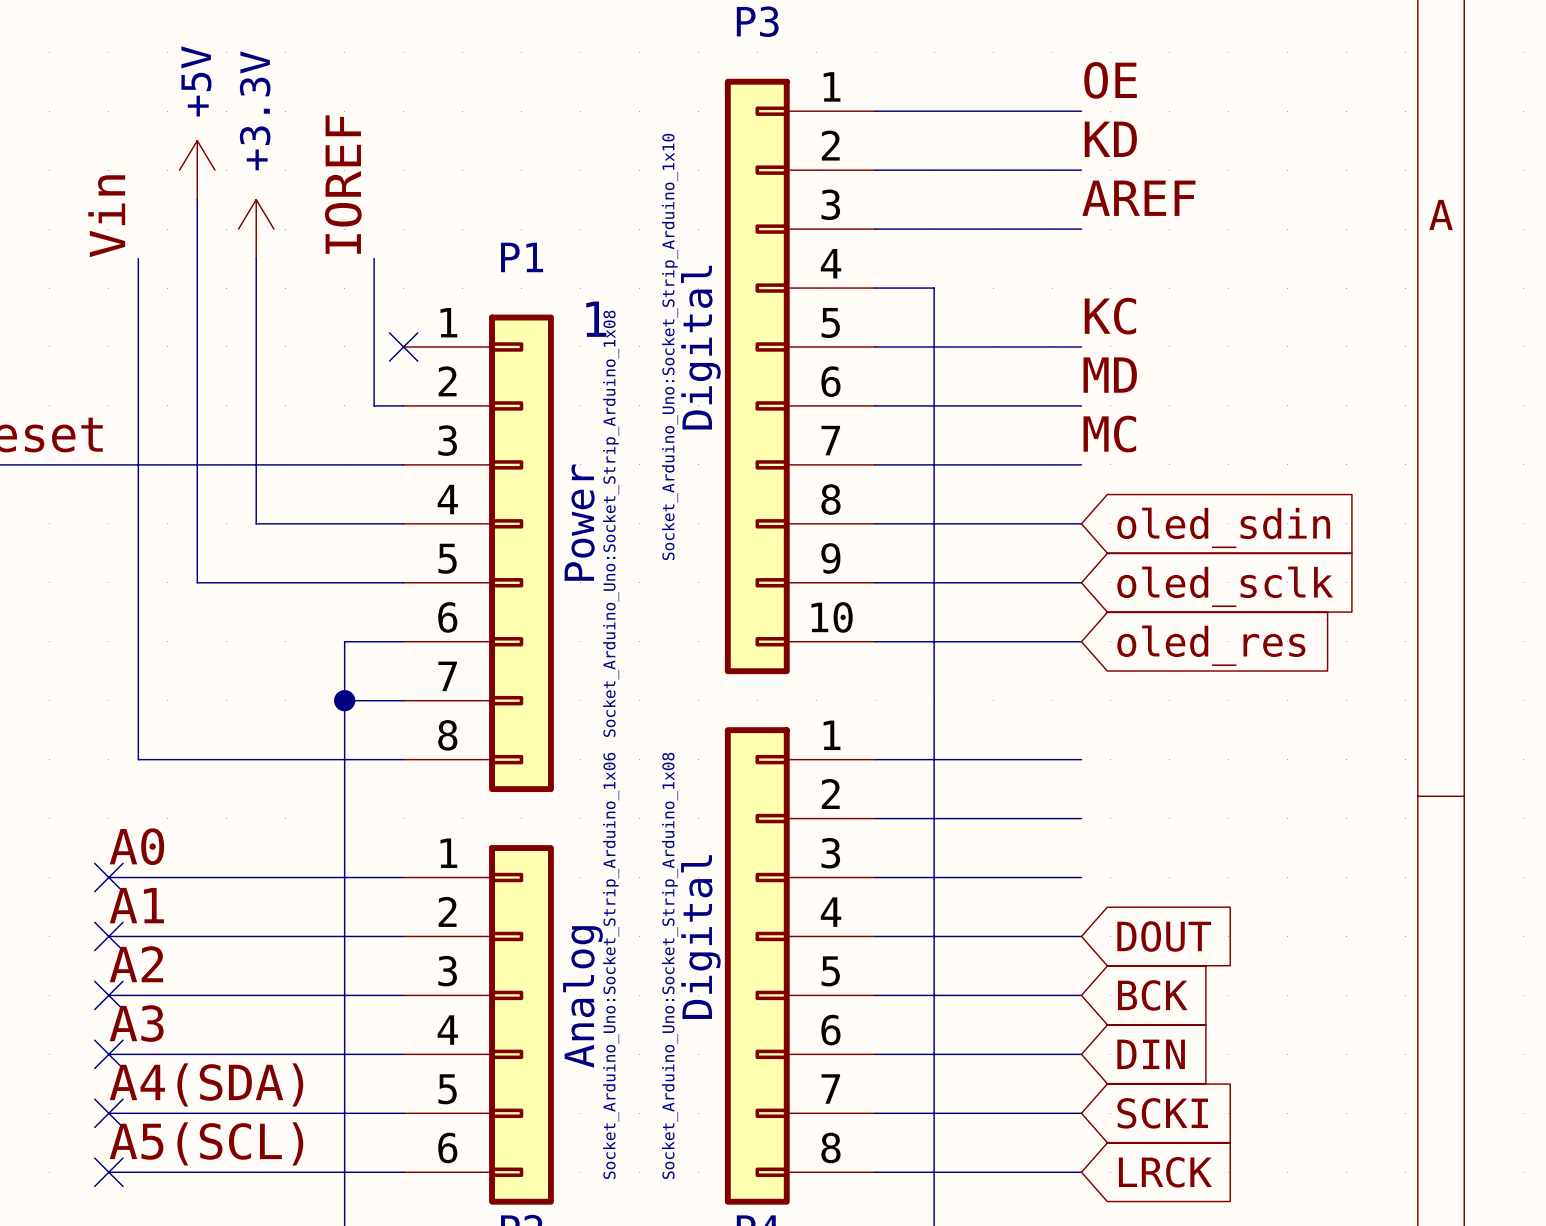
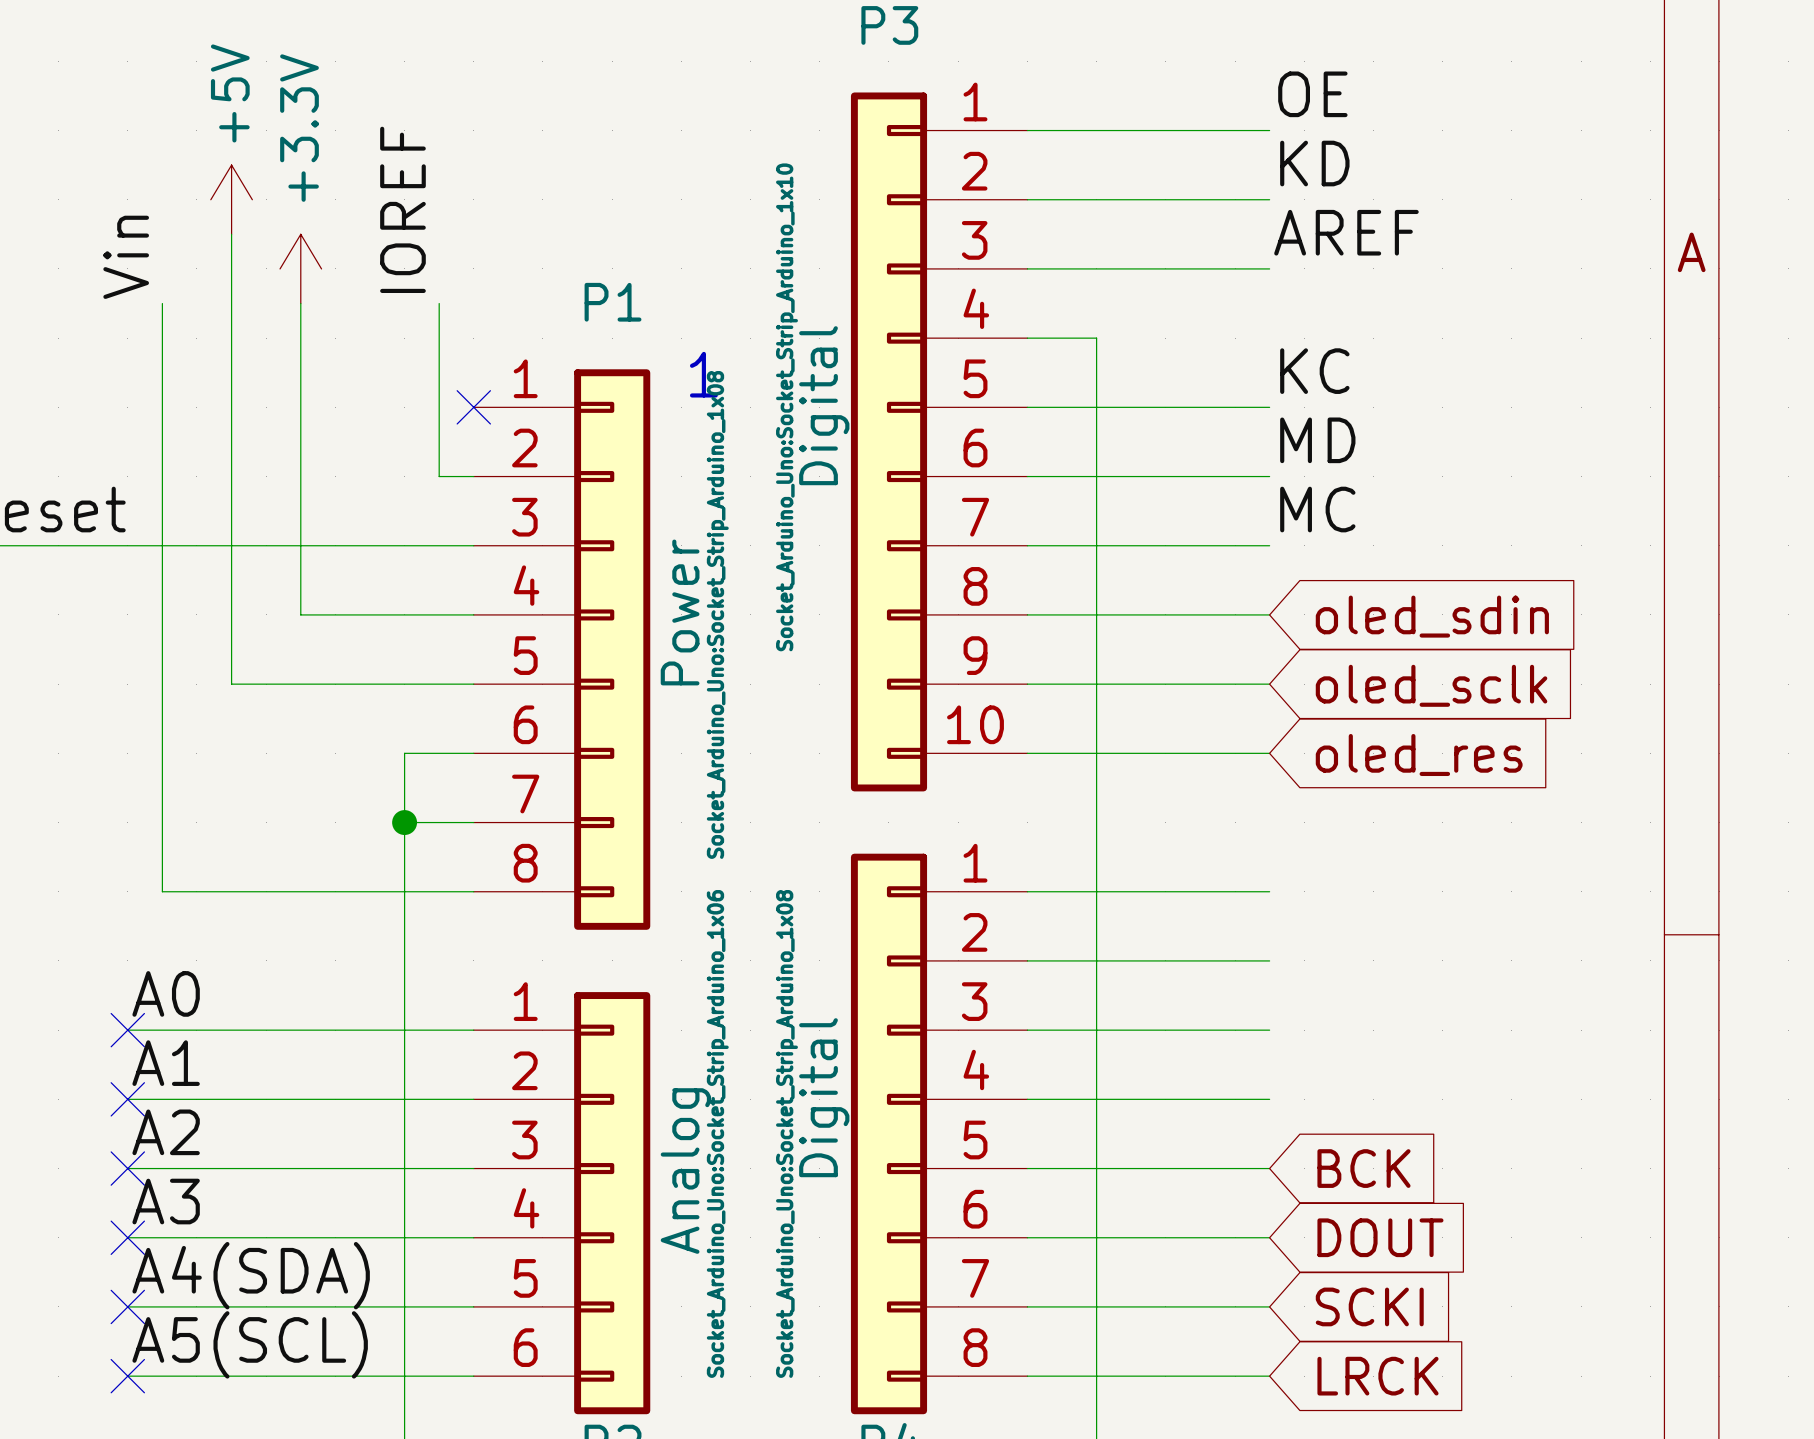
global label: DOUT (1164, 936) -> none
global label: DIN (1151, 1054) -> DOUT (1380, 1237)

